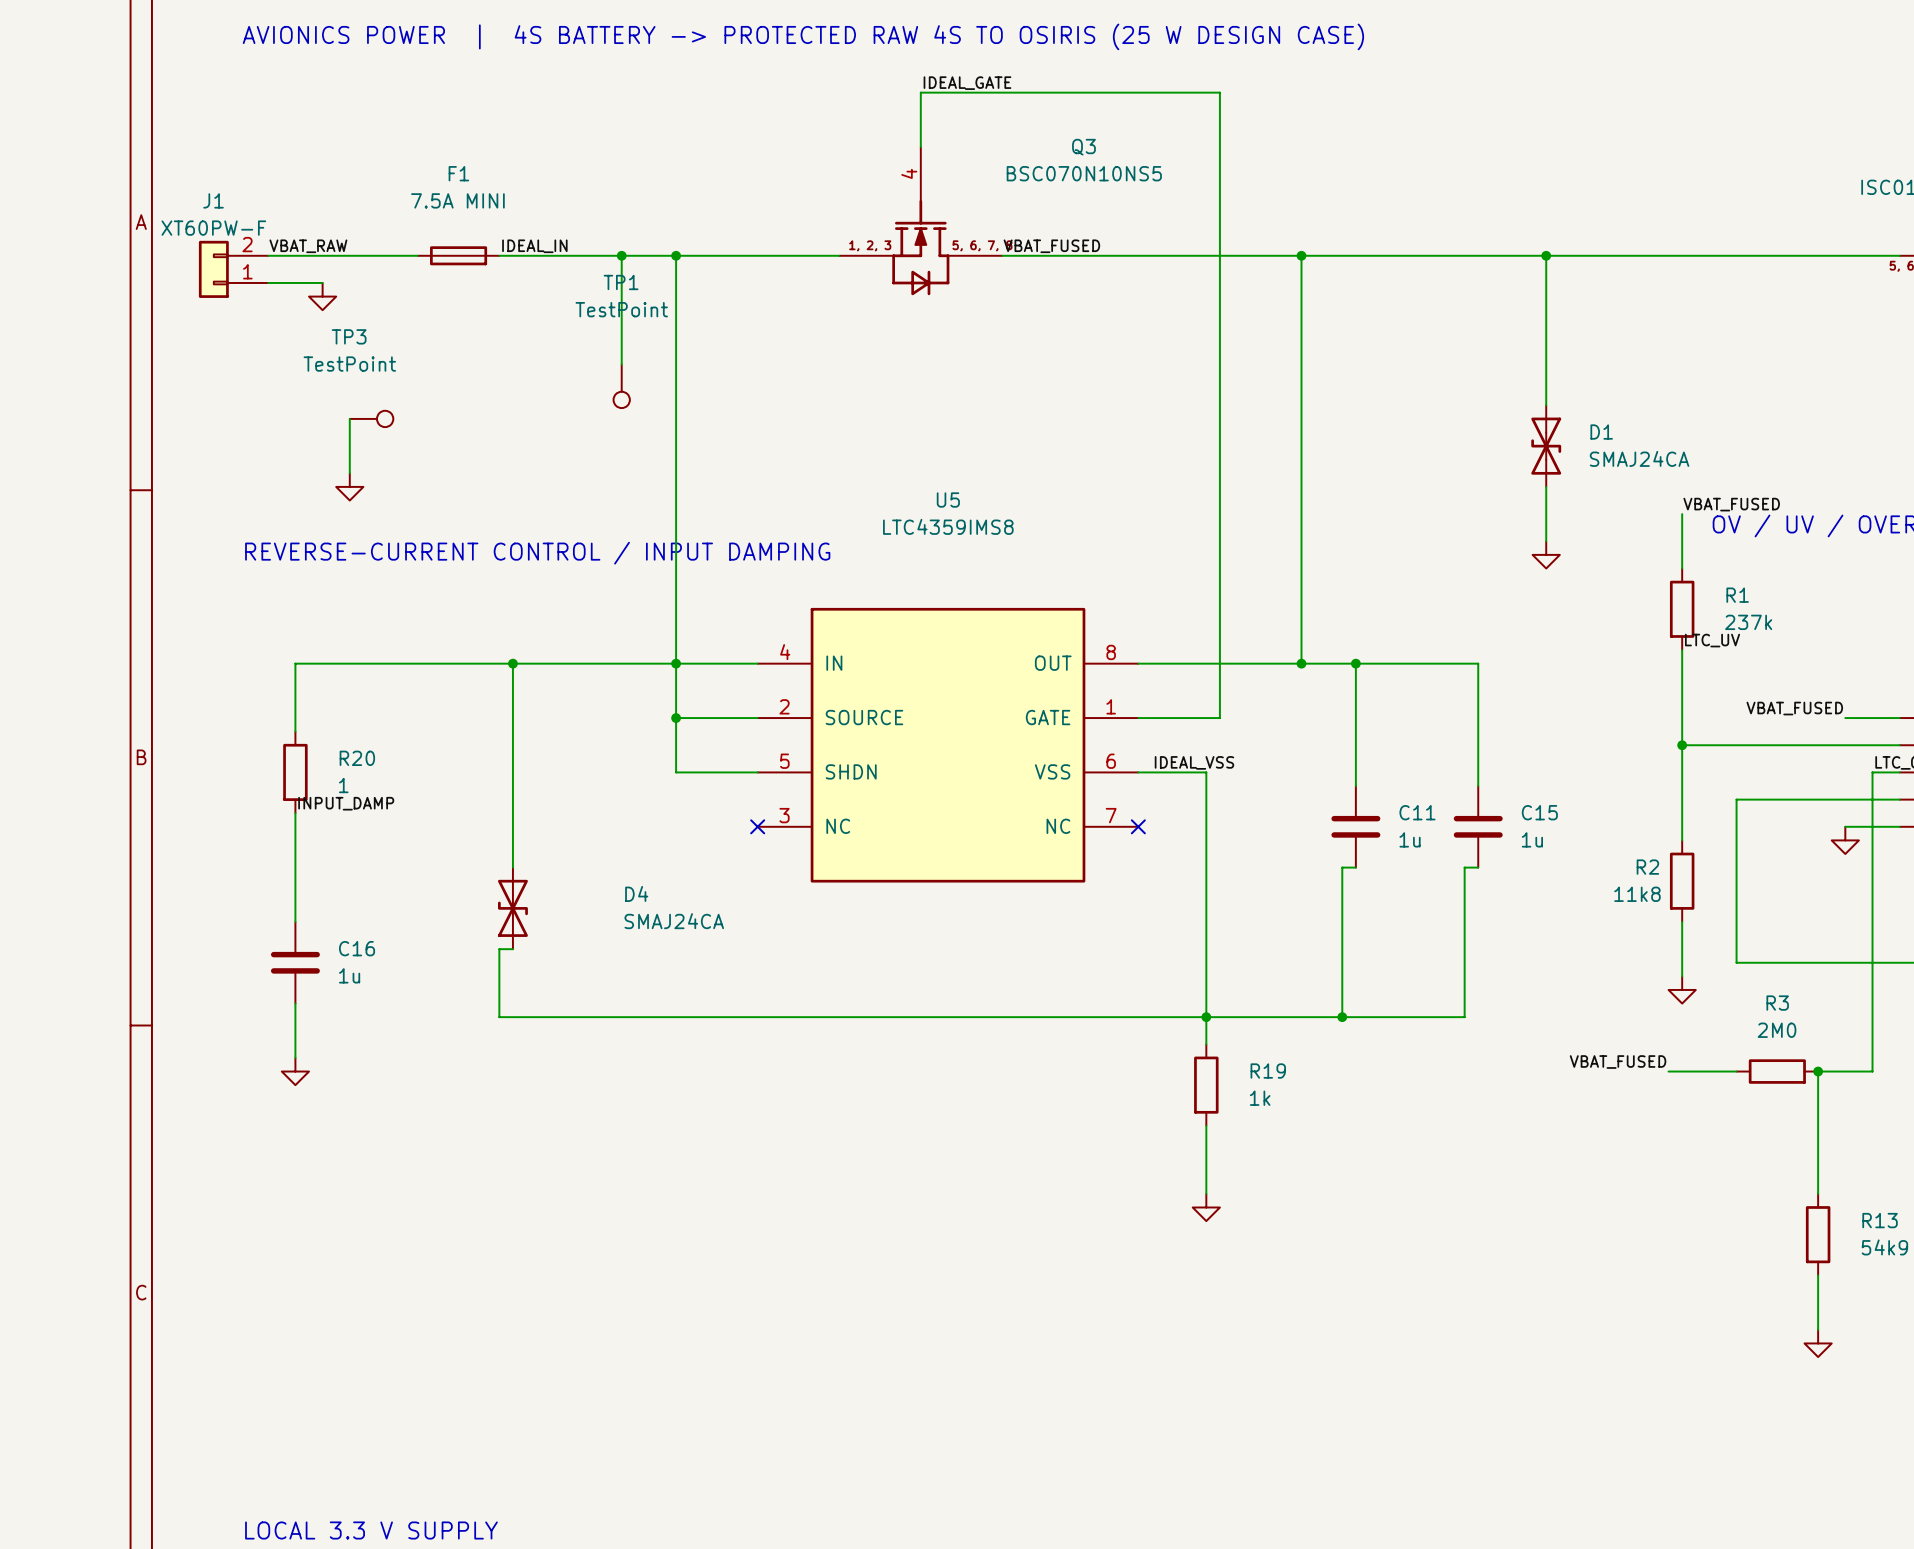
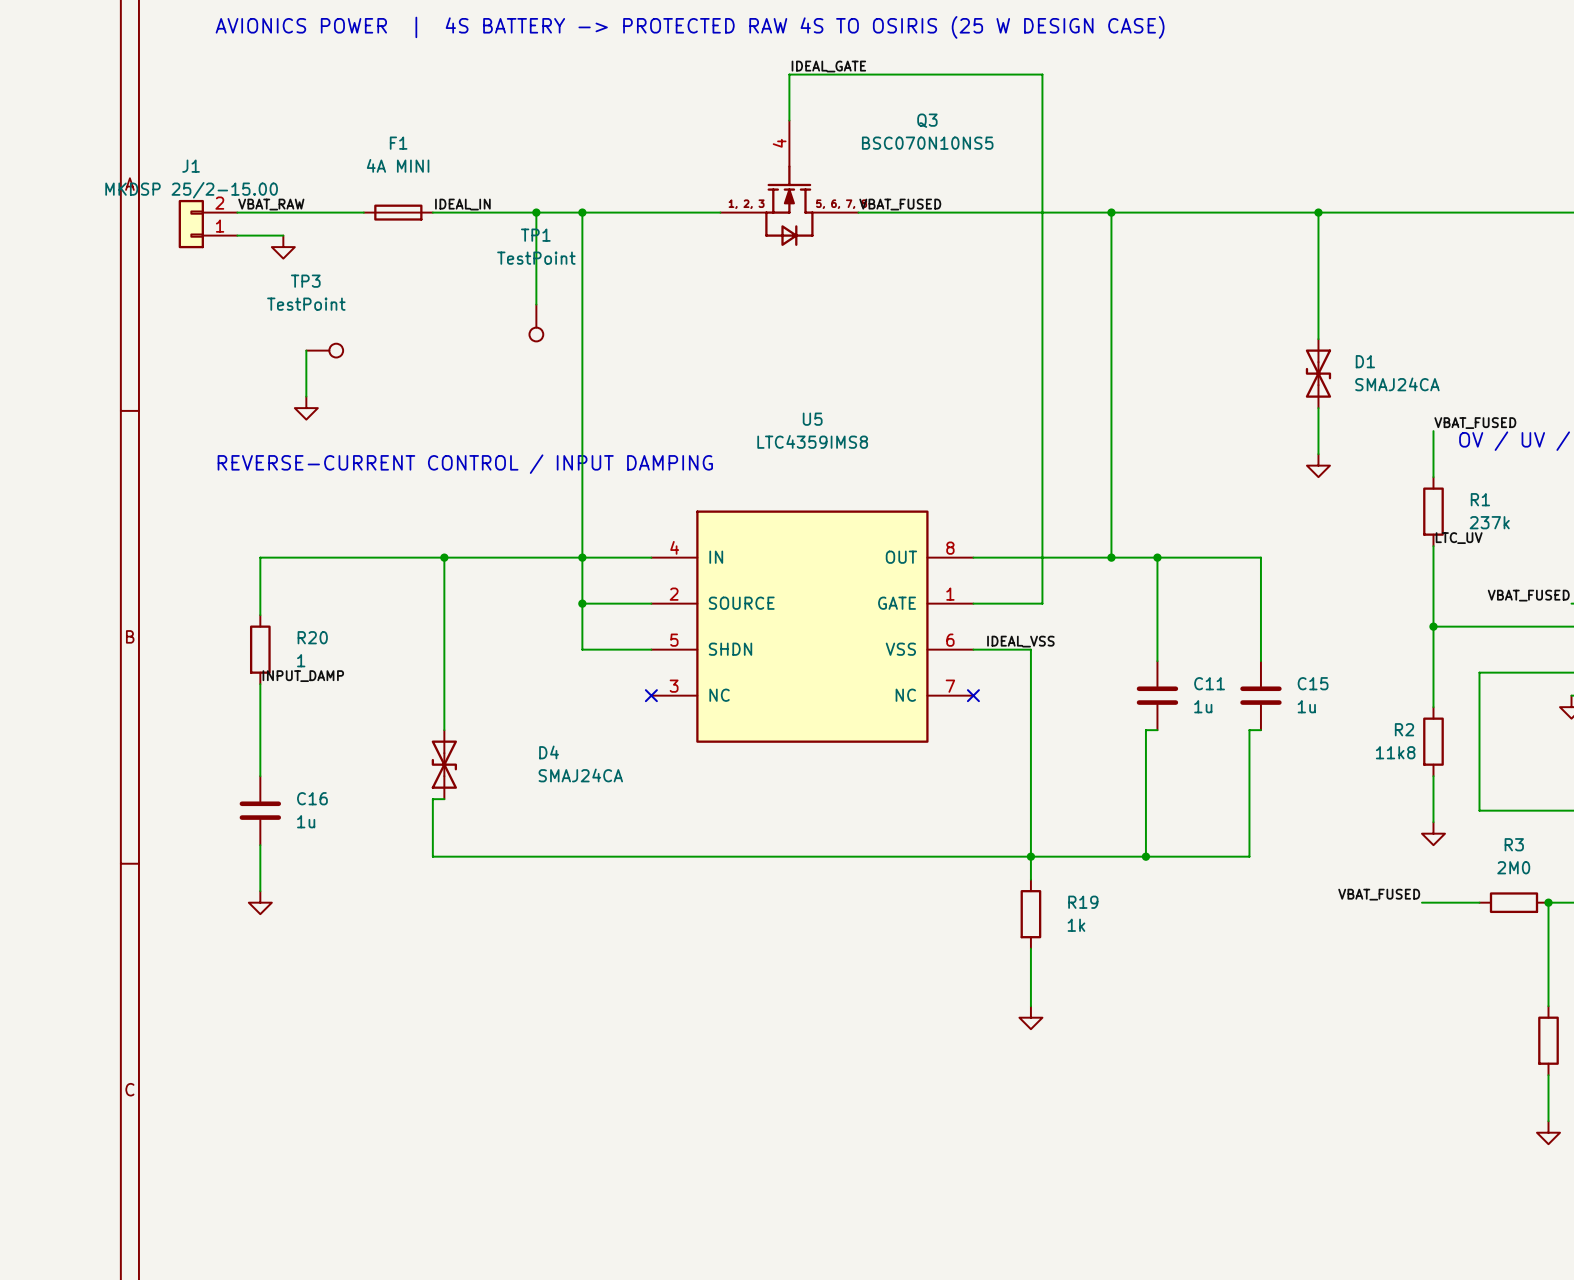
F1 value: 7.5A MINI (457, 200) -> 4A MINI (398, 165)
J1 value: XT60PW-F (213, 228) -> MKDSP 25/2-15.00 (191, 190)

